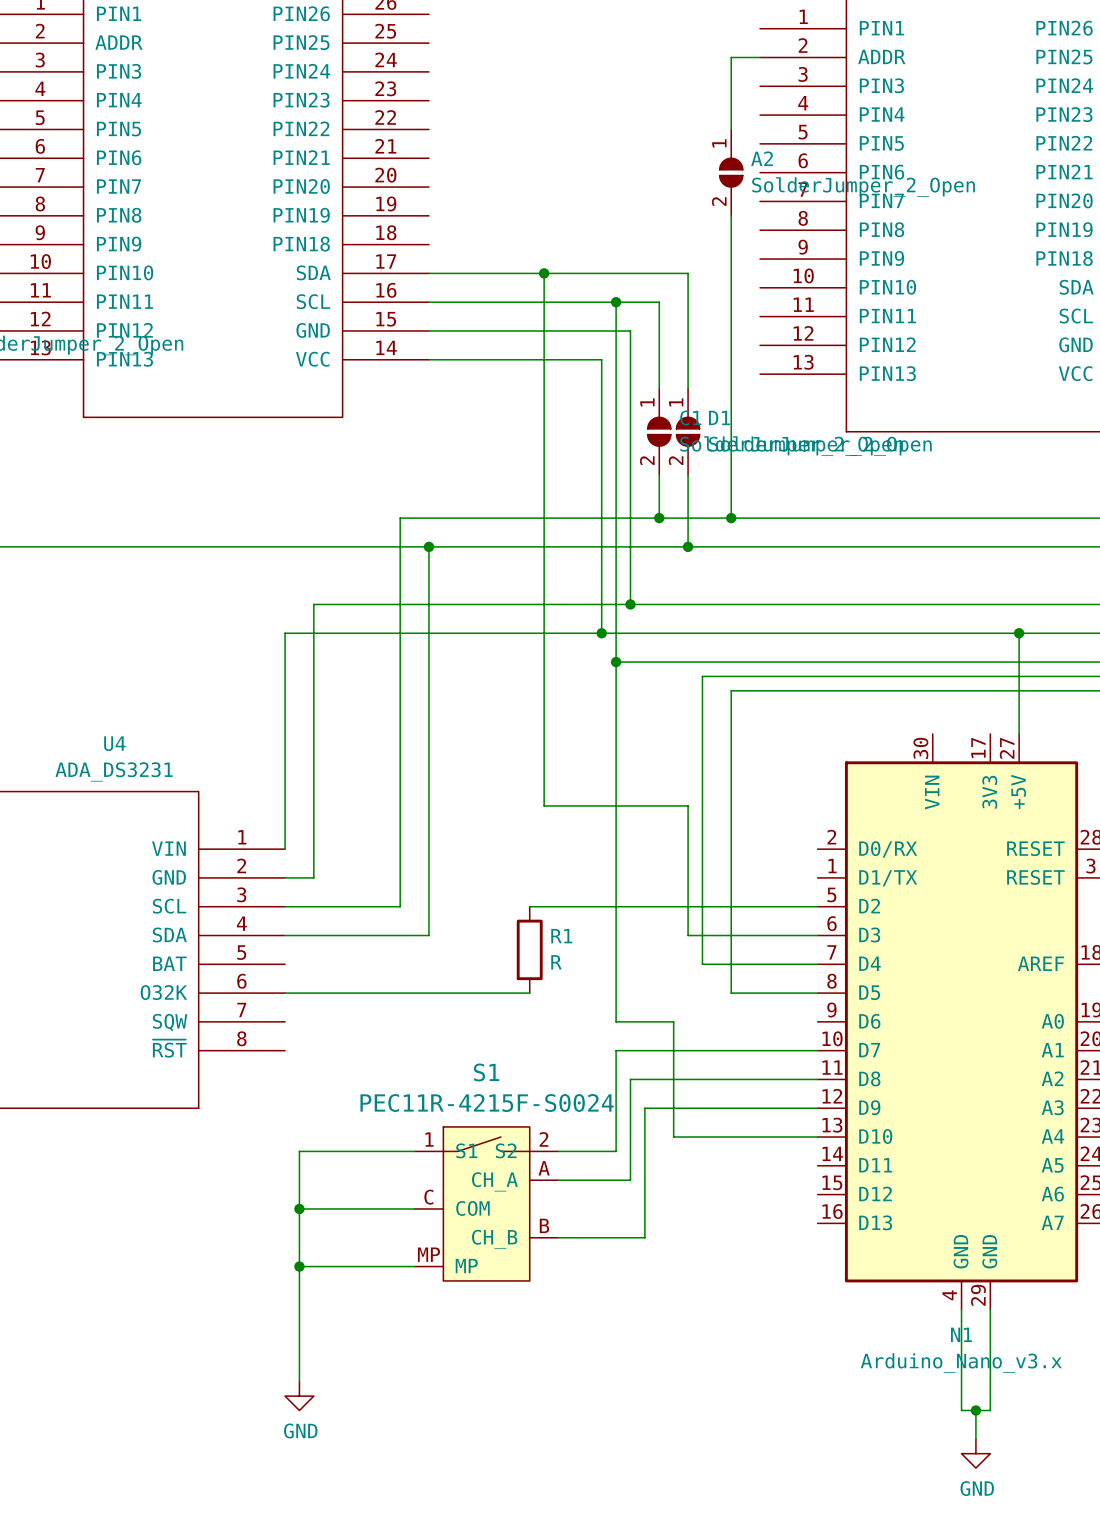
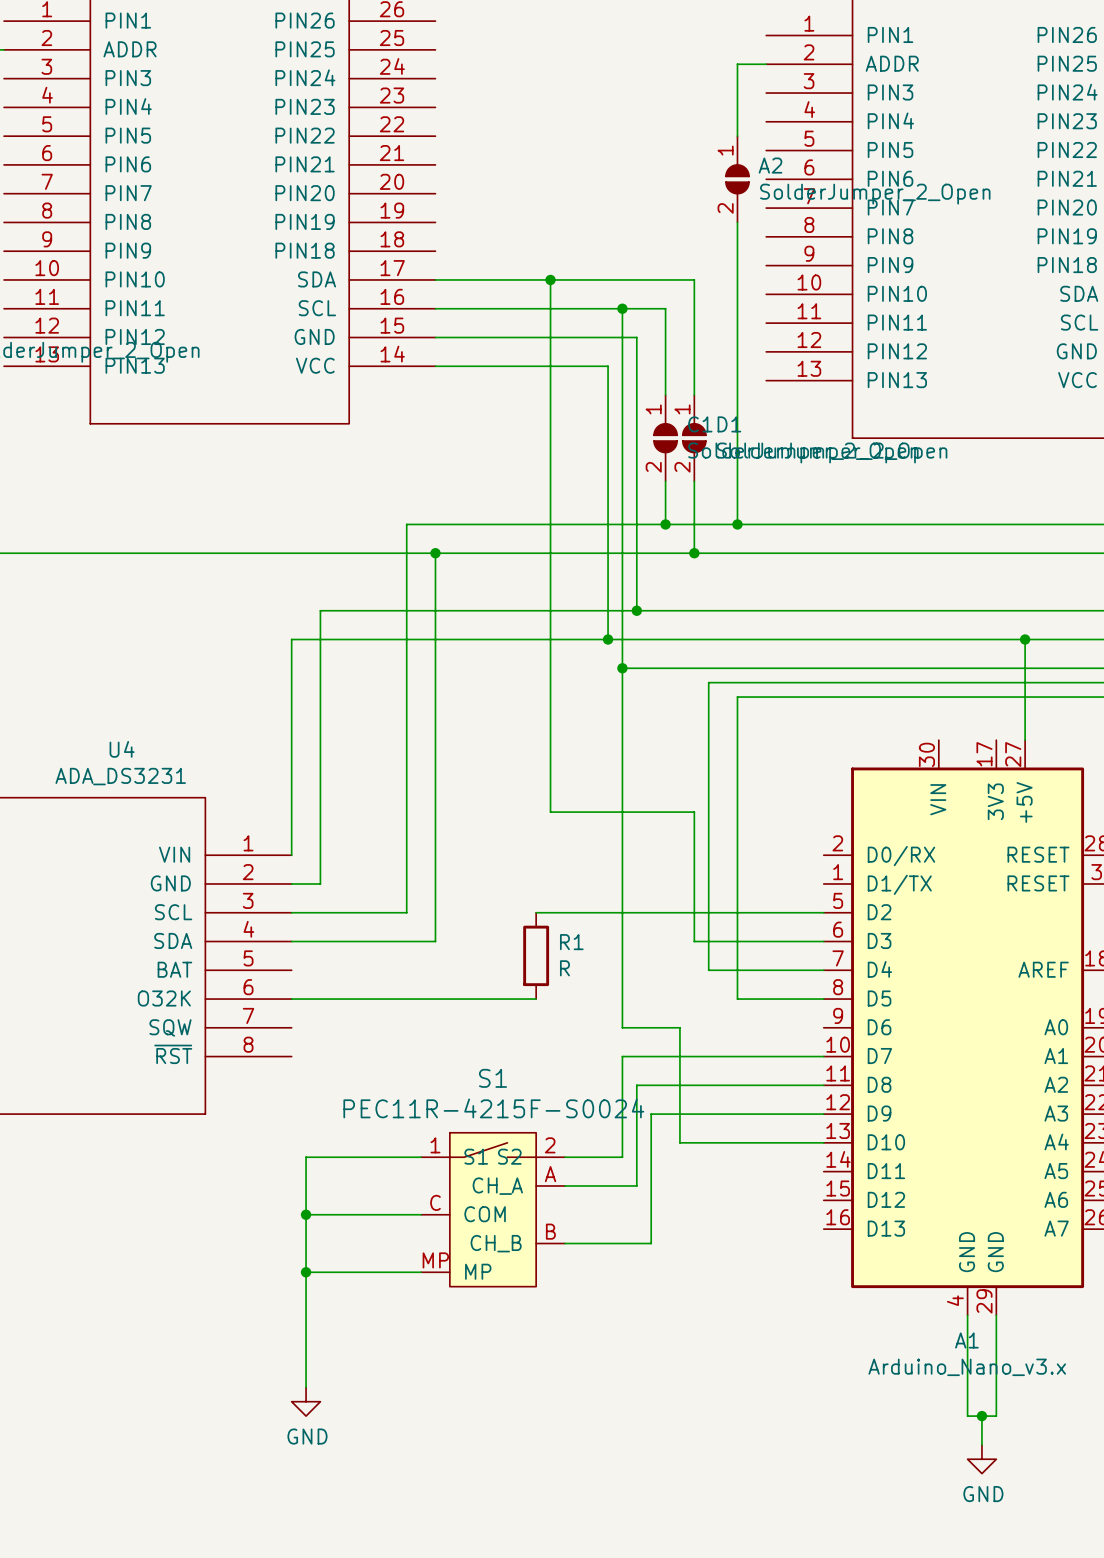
N1 name: N1 (961, 1334) -> A1 (966, 1340)

